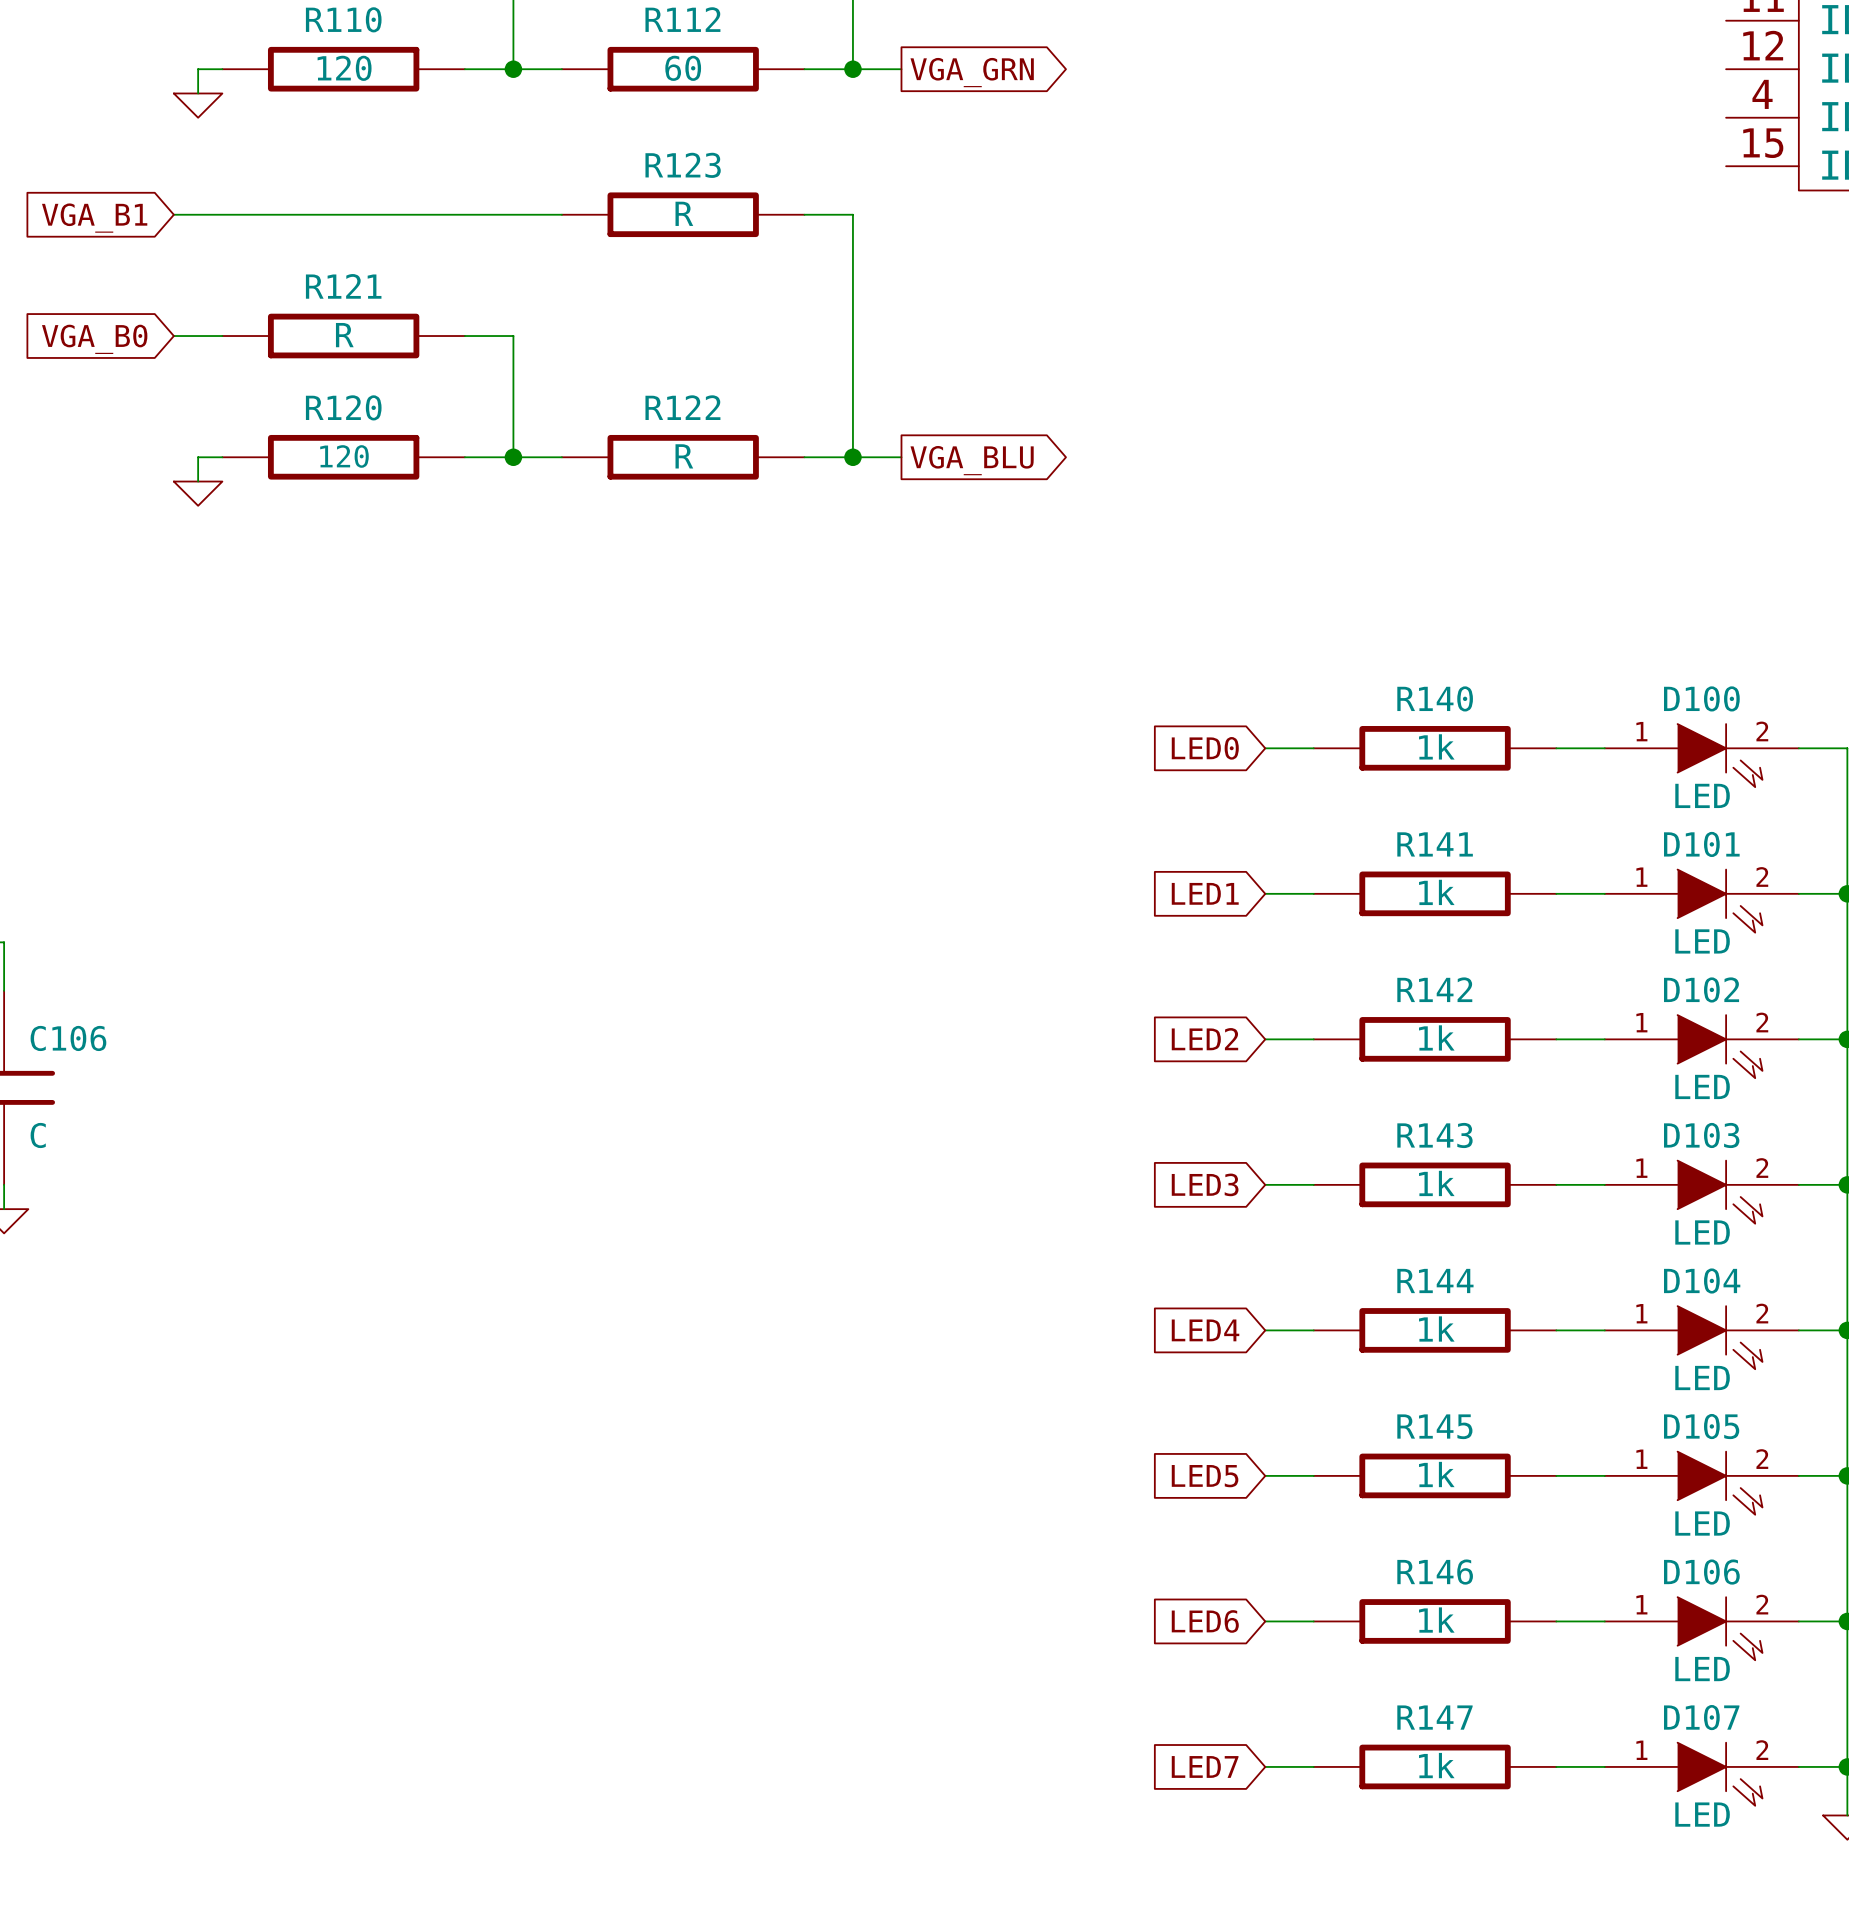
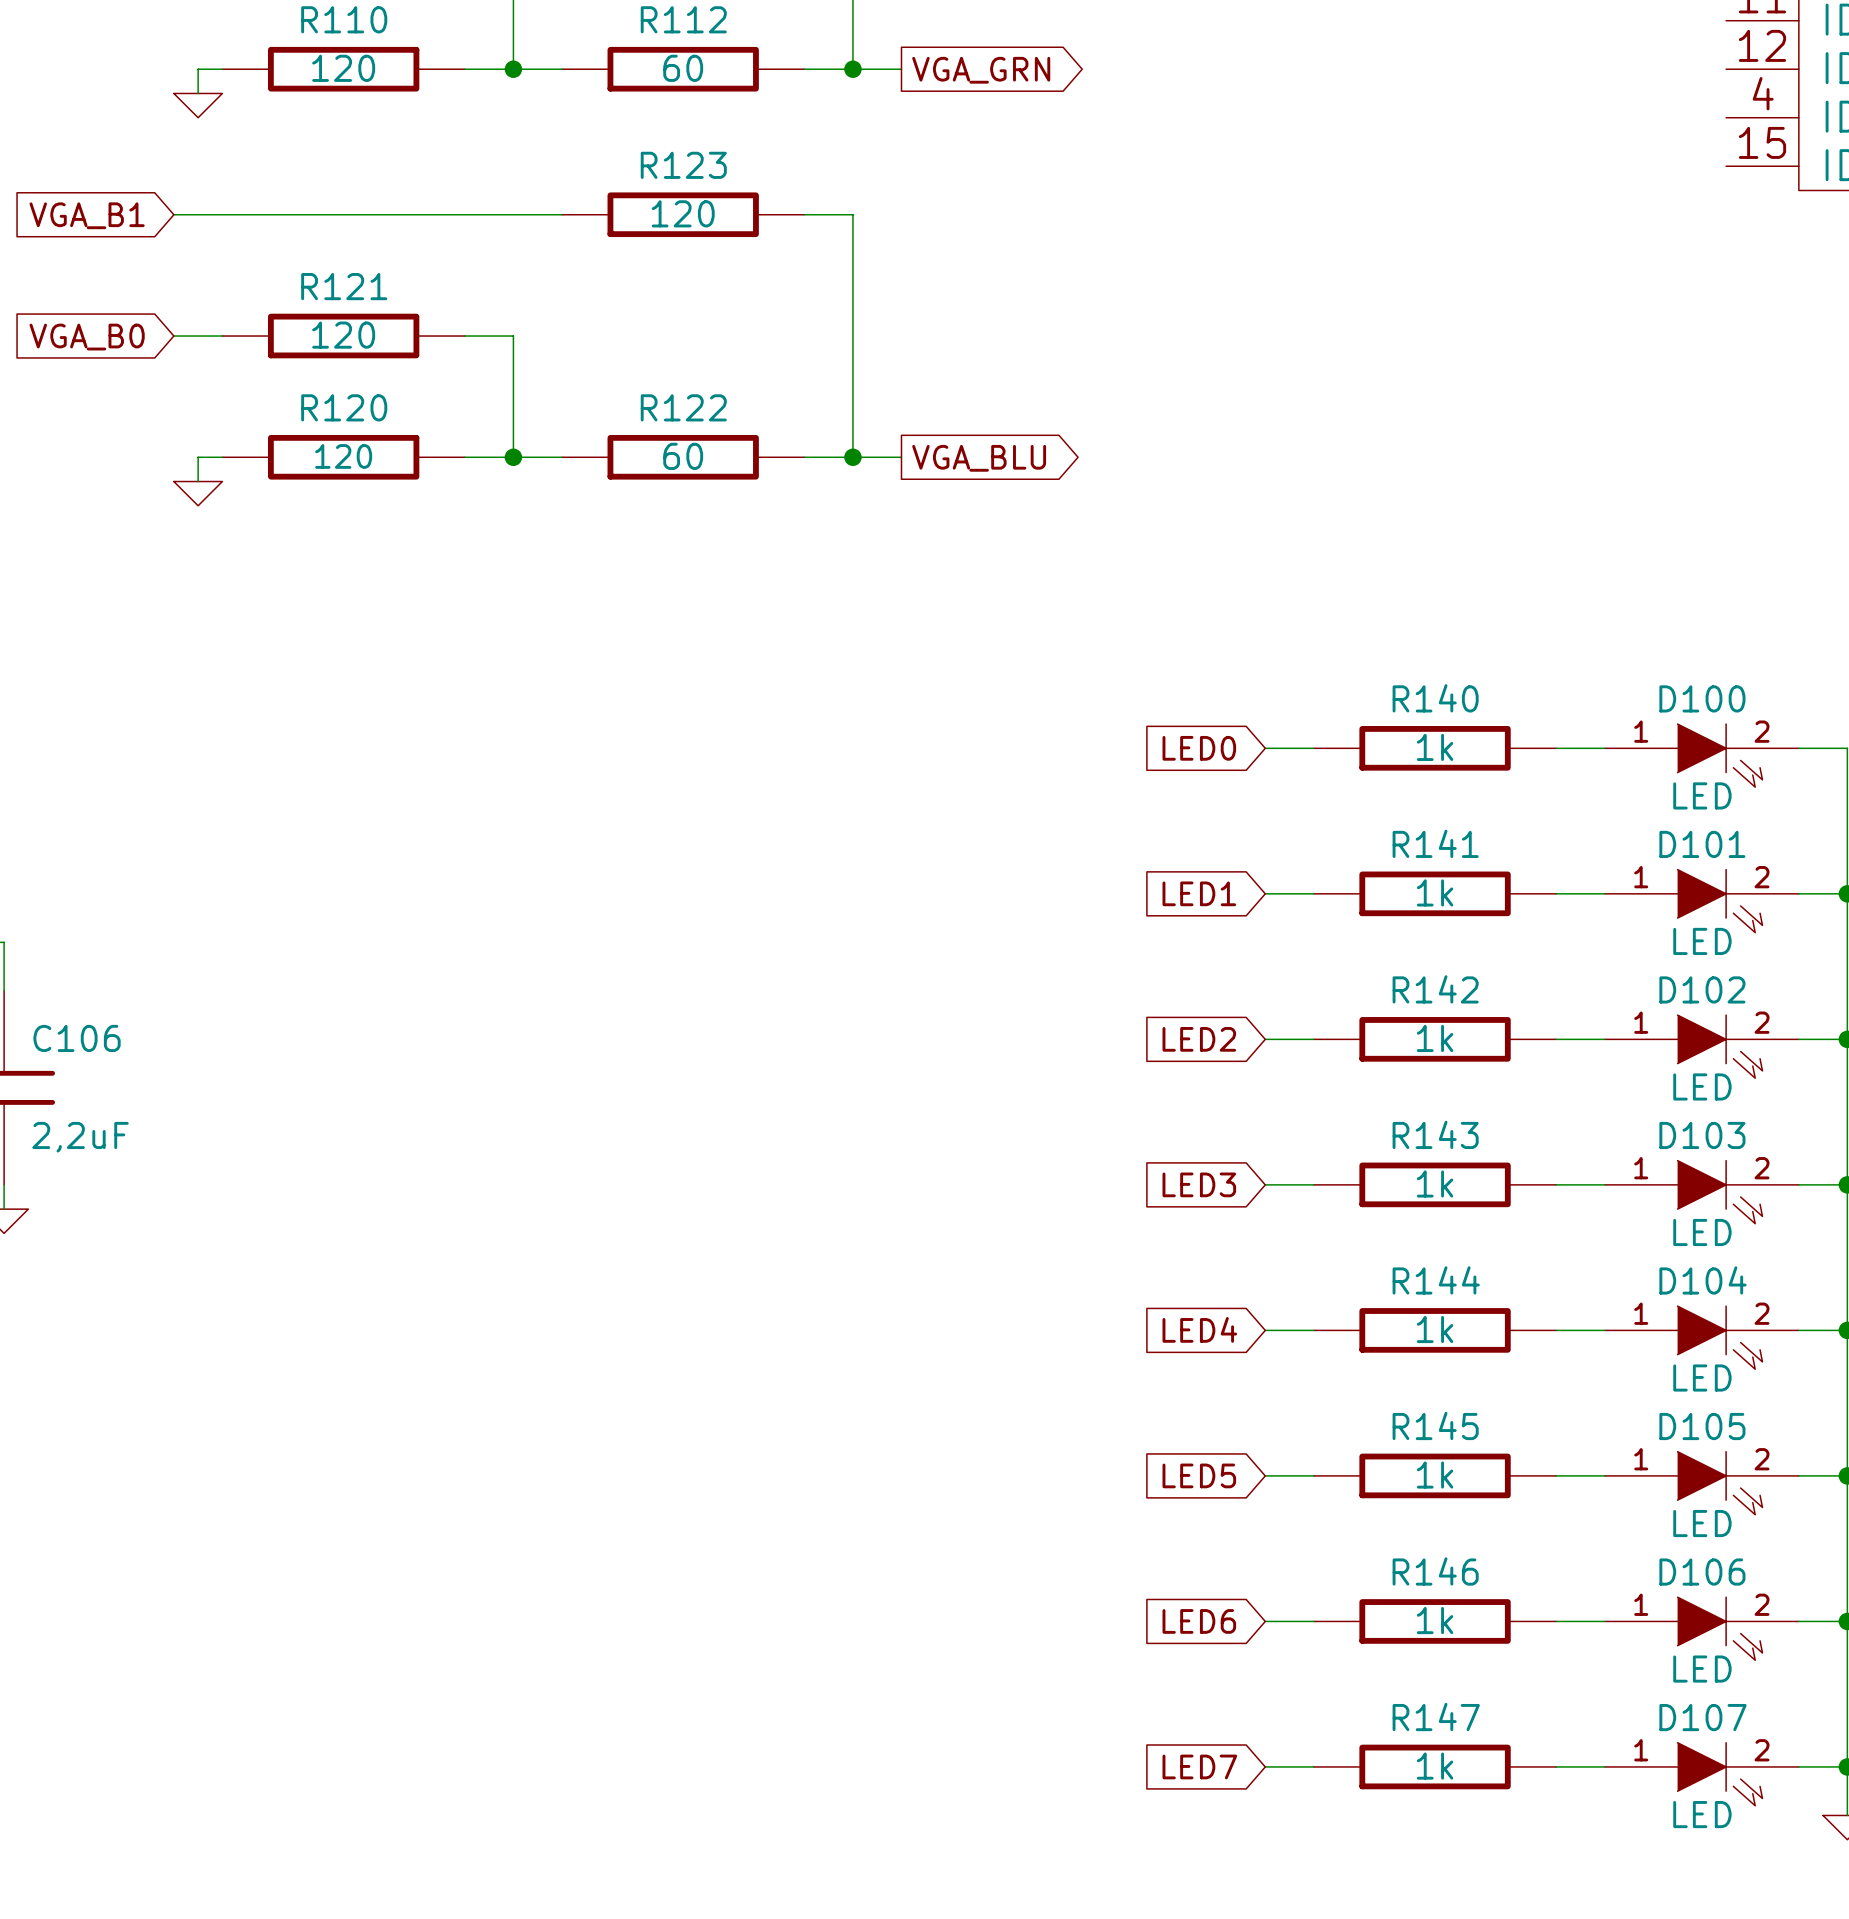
R123 value: R (684, 213) -> 120 (683, 213)
R121 value: R (344, 335) -> 120 (343, 335)
R122 value: R (684, 456) -> 60 (683, 456)
C106 value: C (38, 1135) -> 2,2uF (80, 1137)

